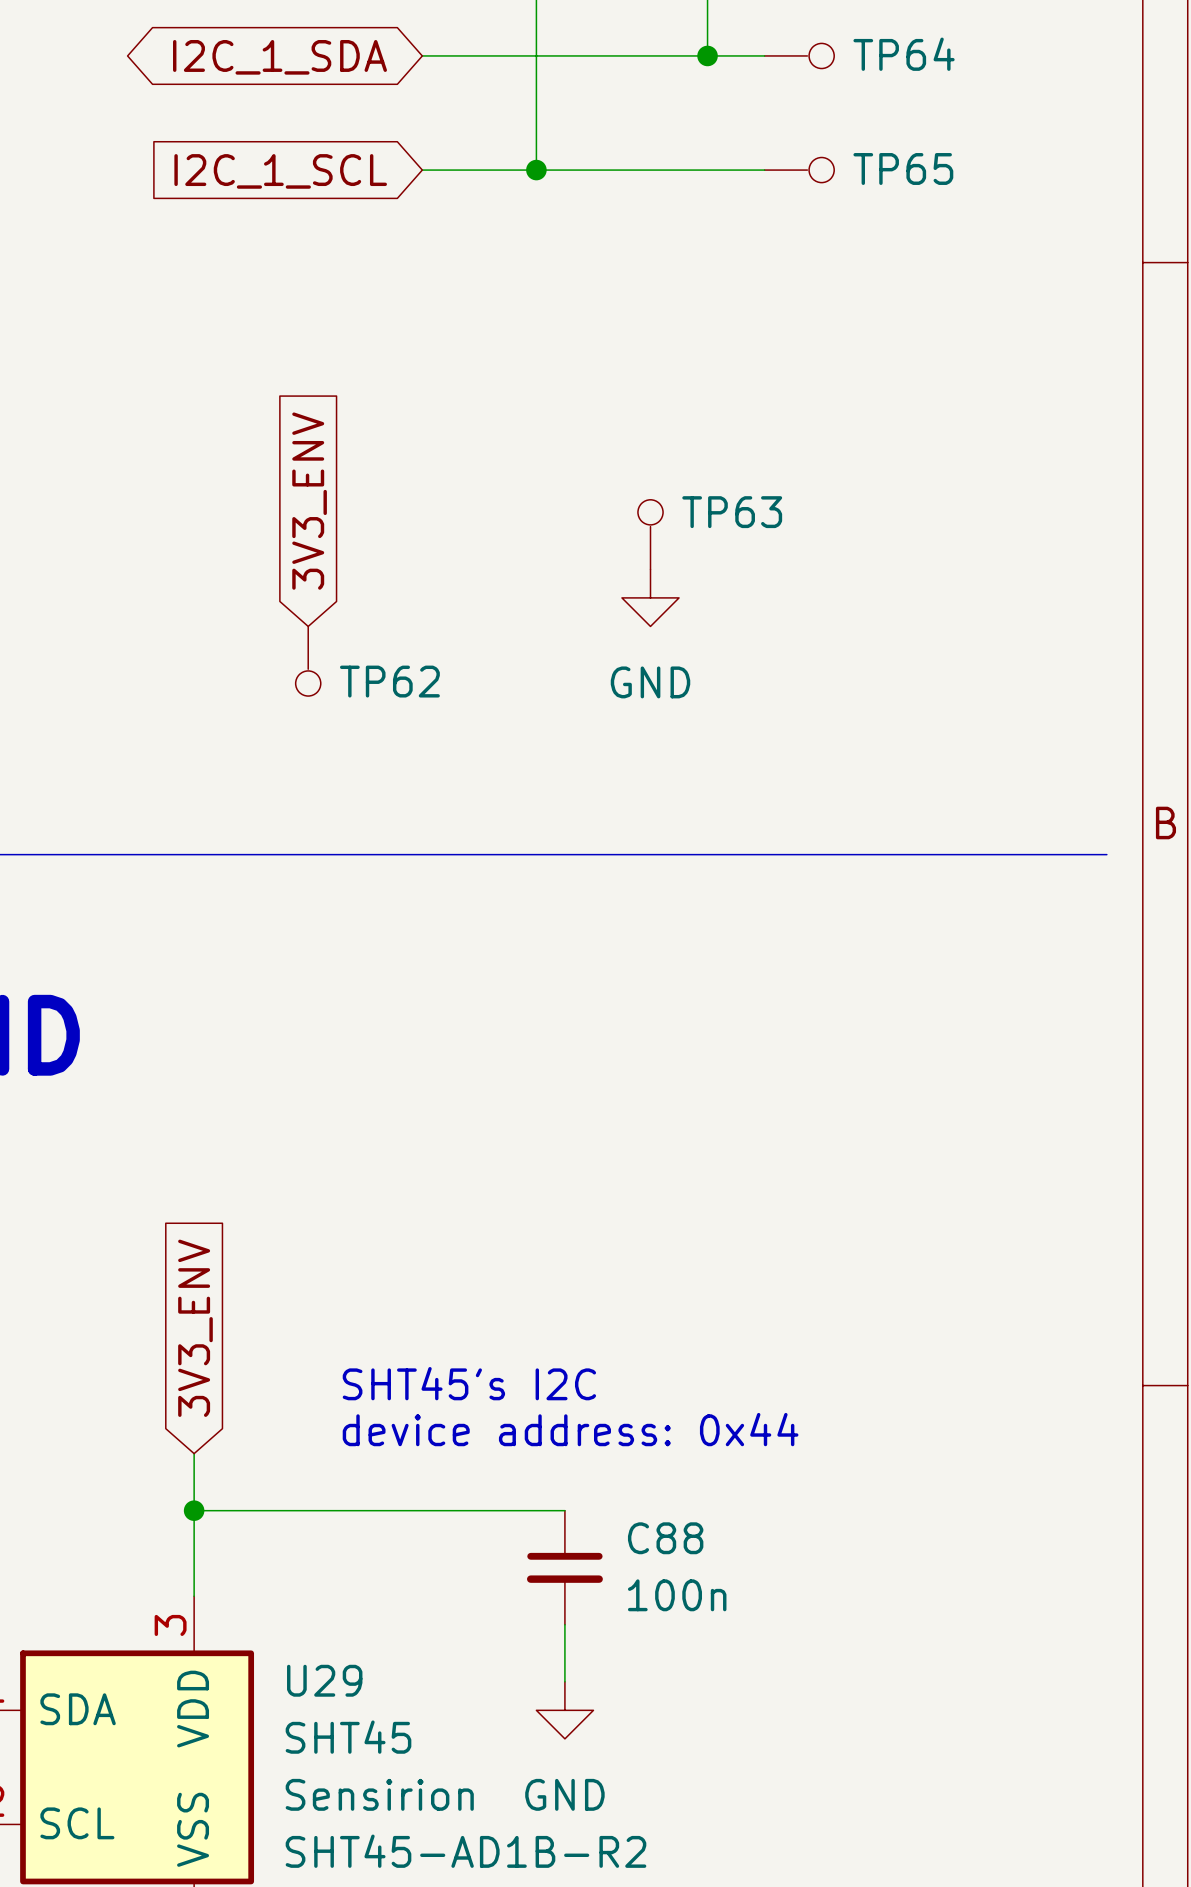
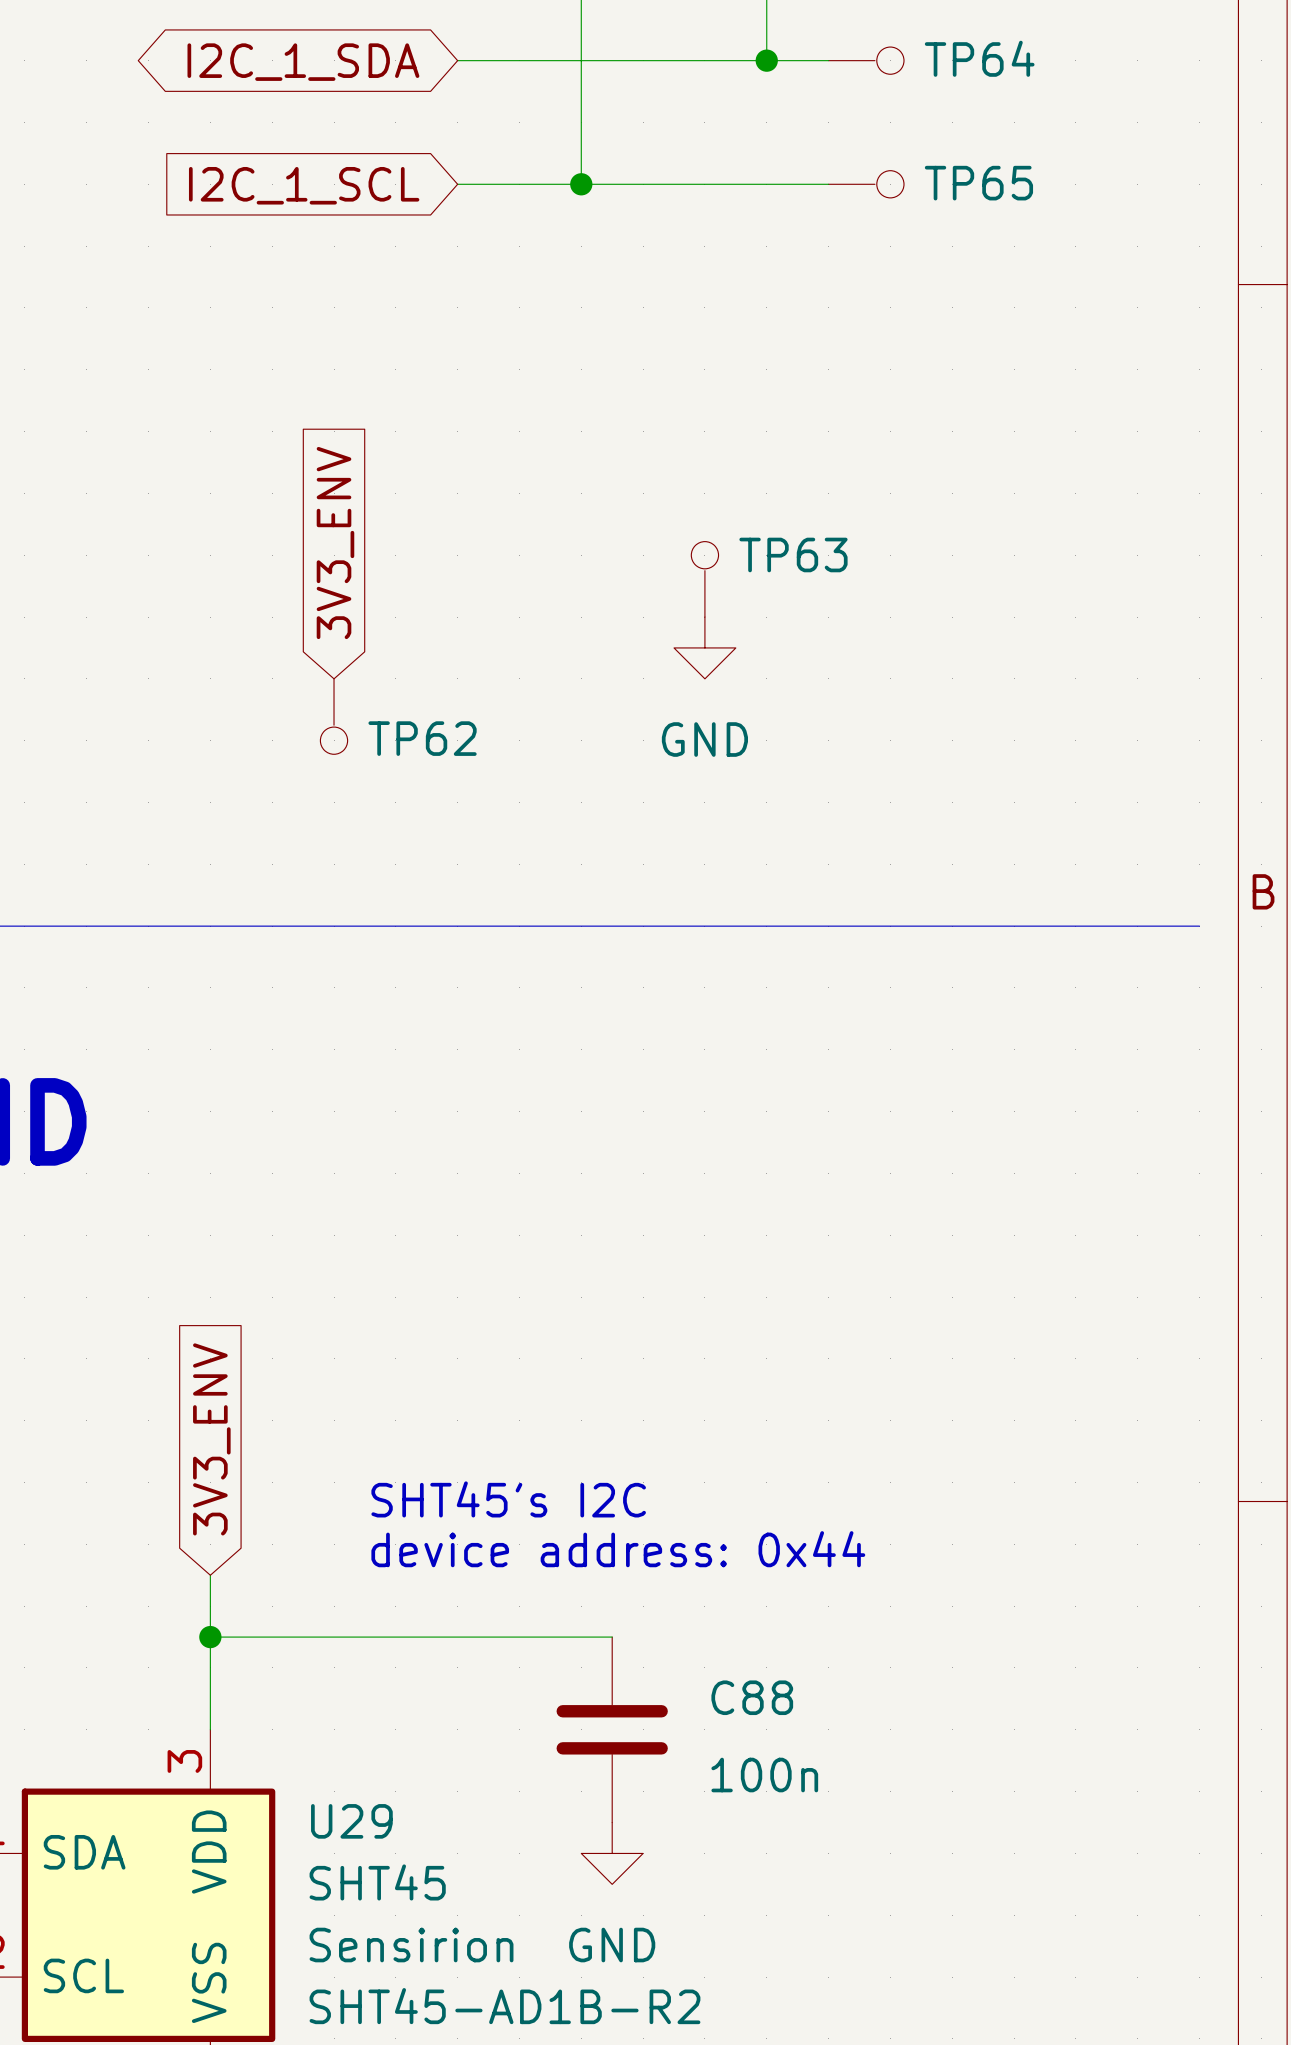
C88 symbol: [526, 1510, 603, 1625] -> [556, 1637, 668, 1823]

